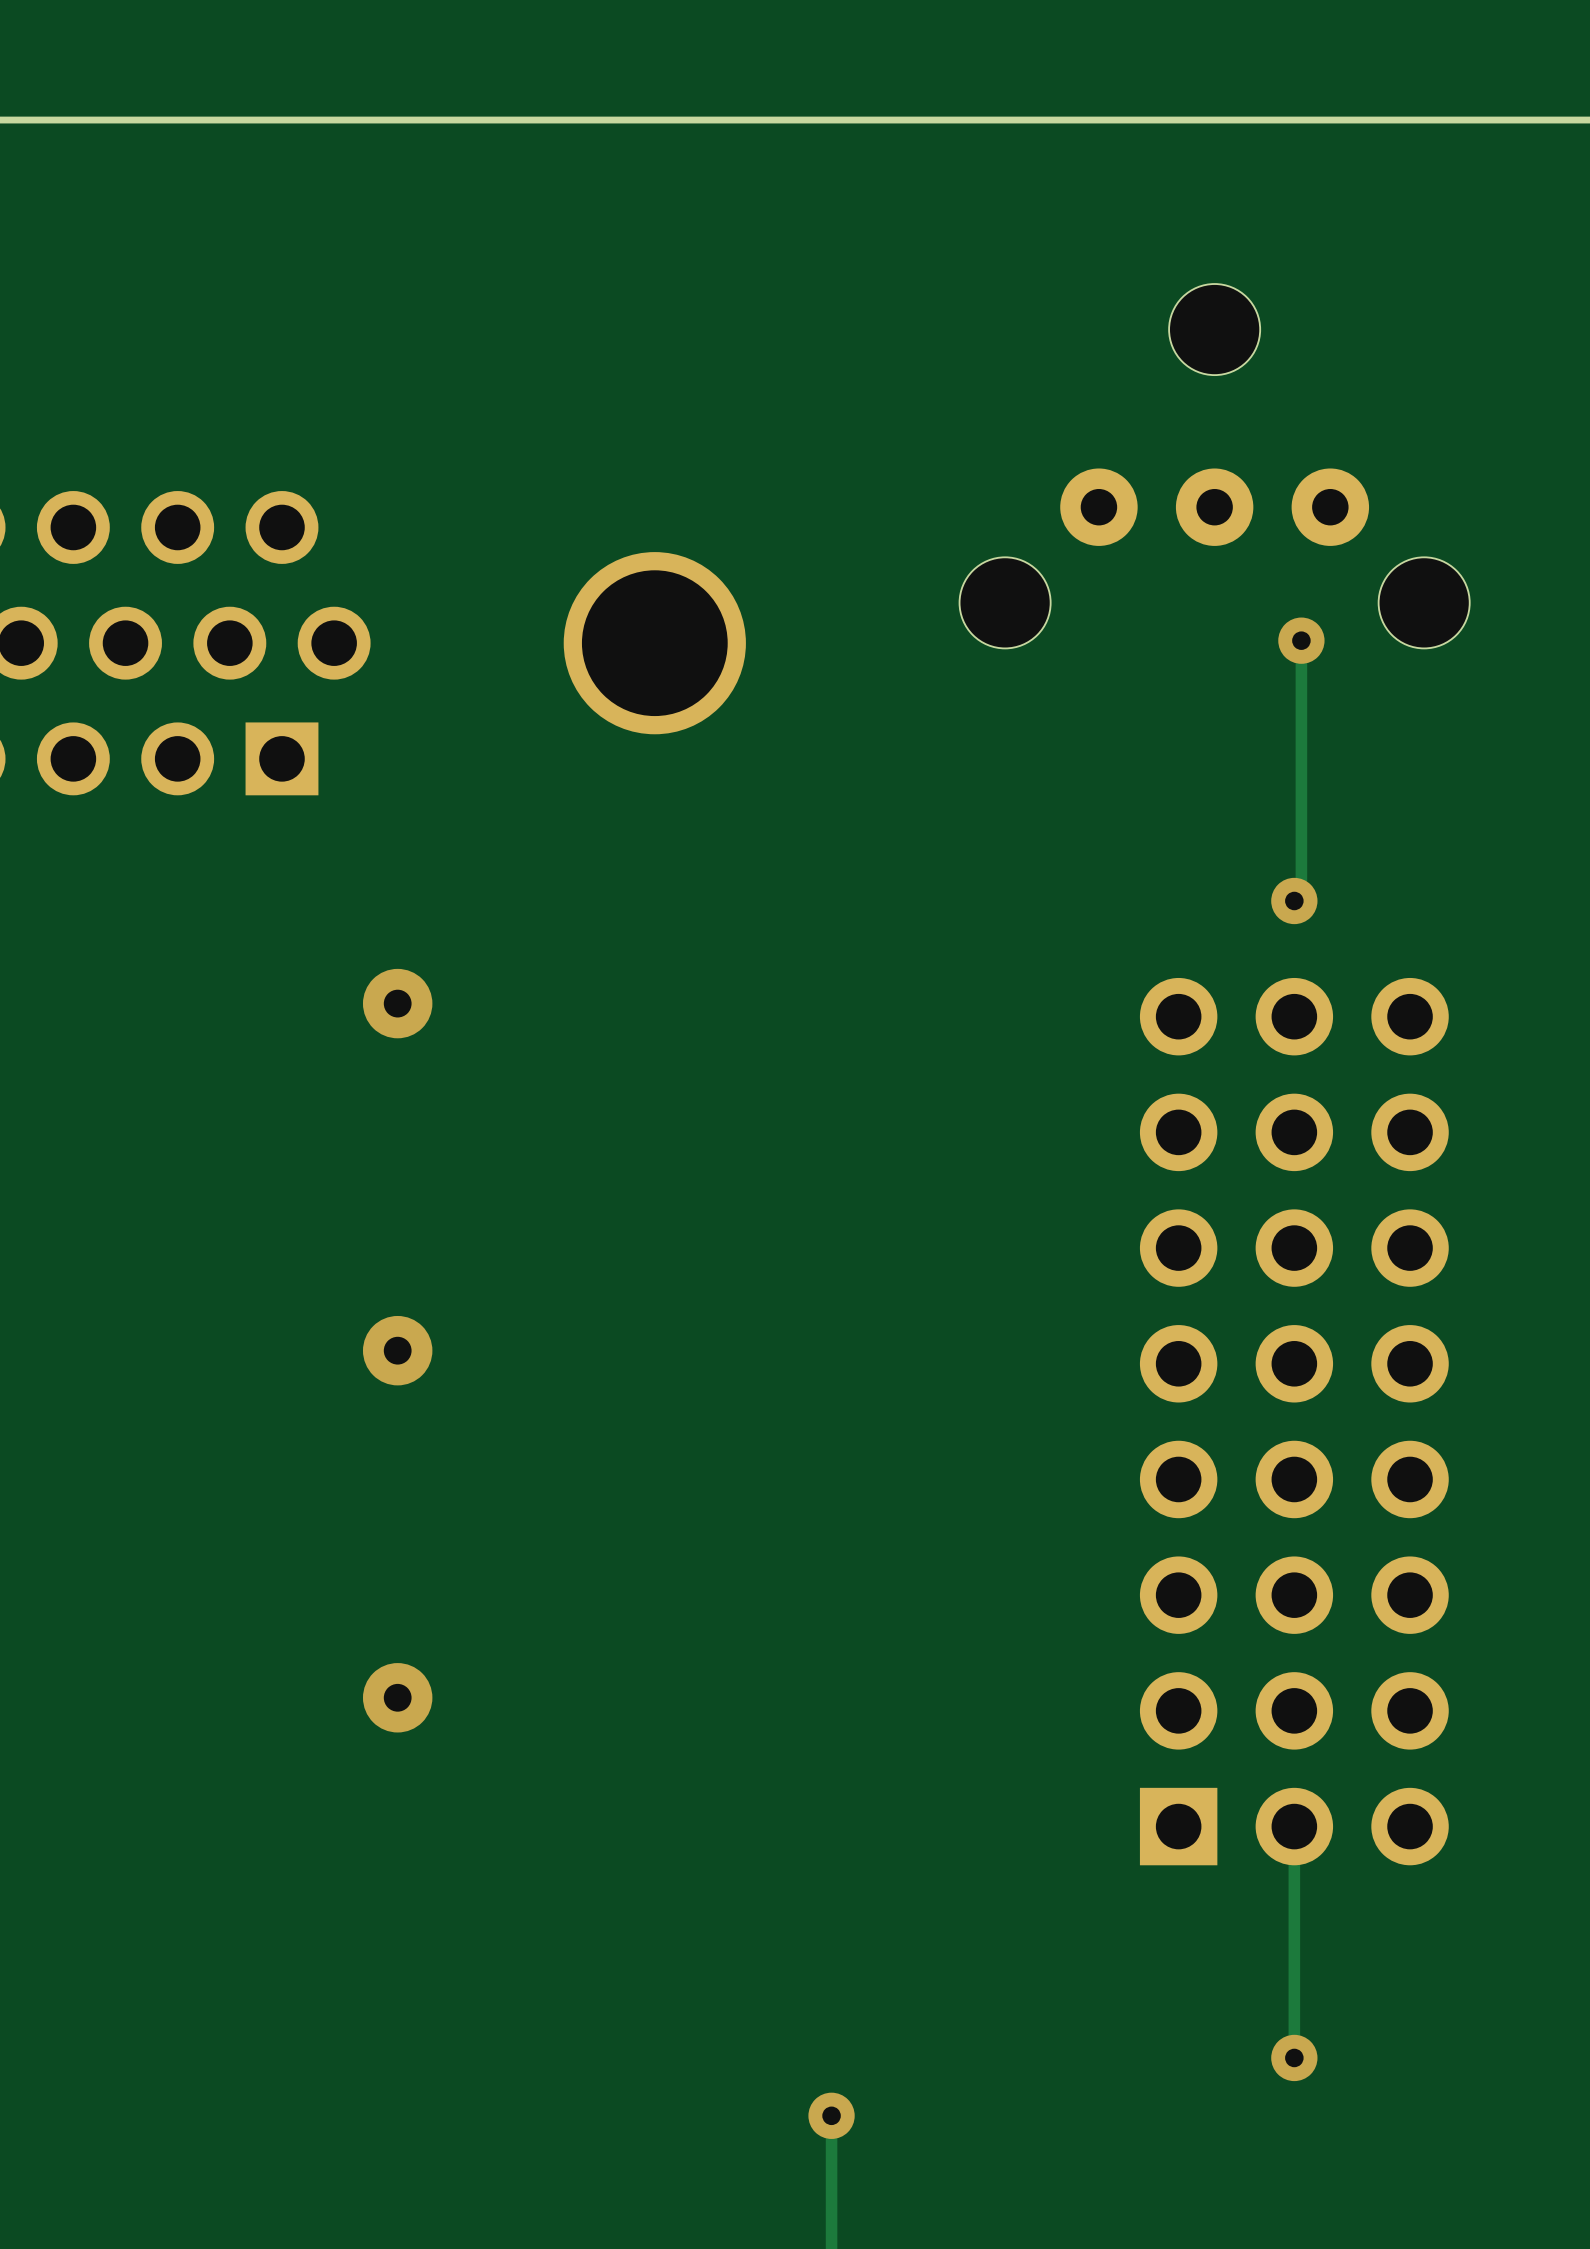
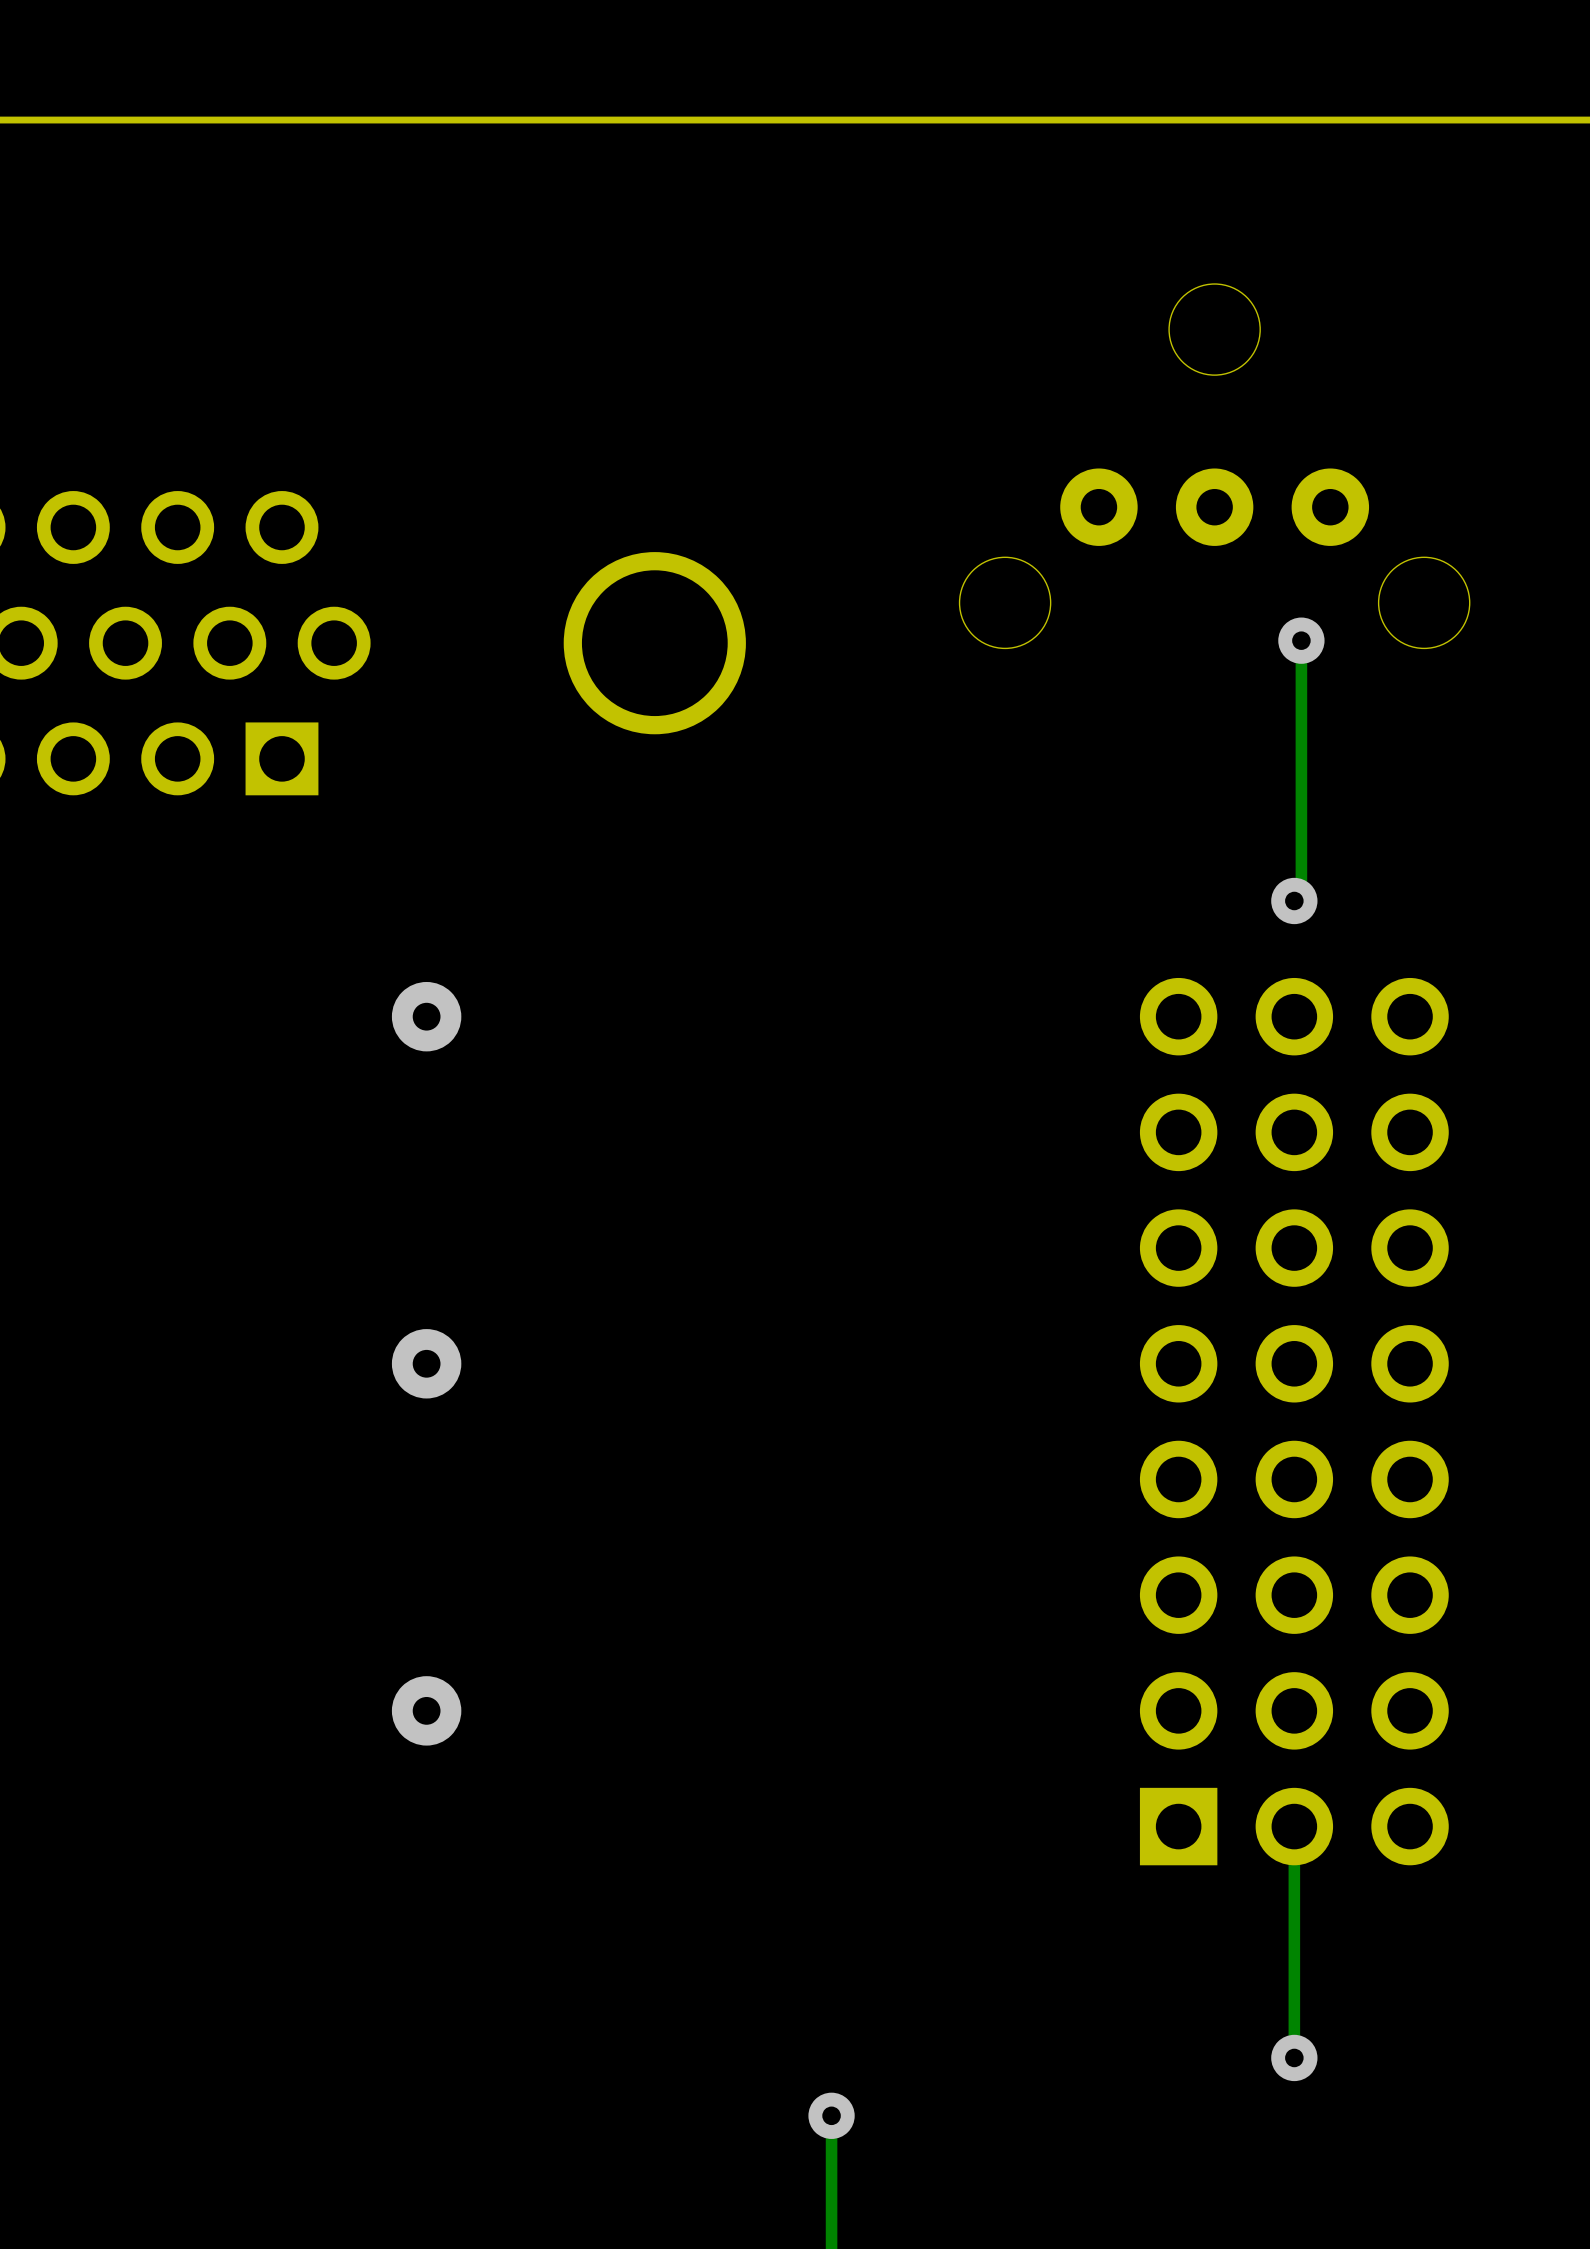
via position: (397, 1003) -> (426, 1016)
via position: (397, 1350) -> (426, 1363)
via position: (397, 1697) -> (426, 1710)

